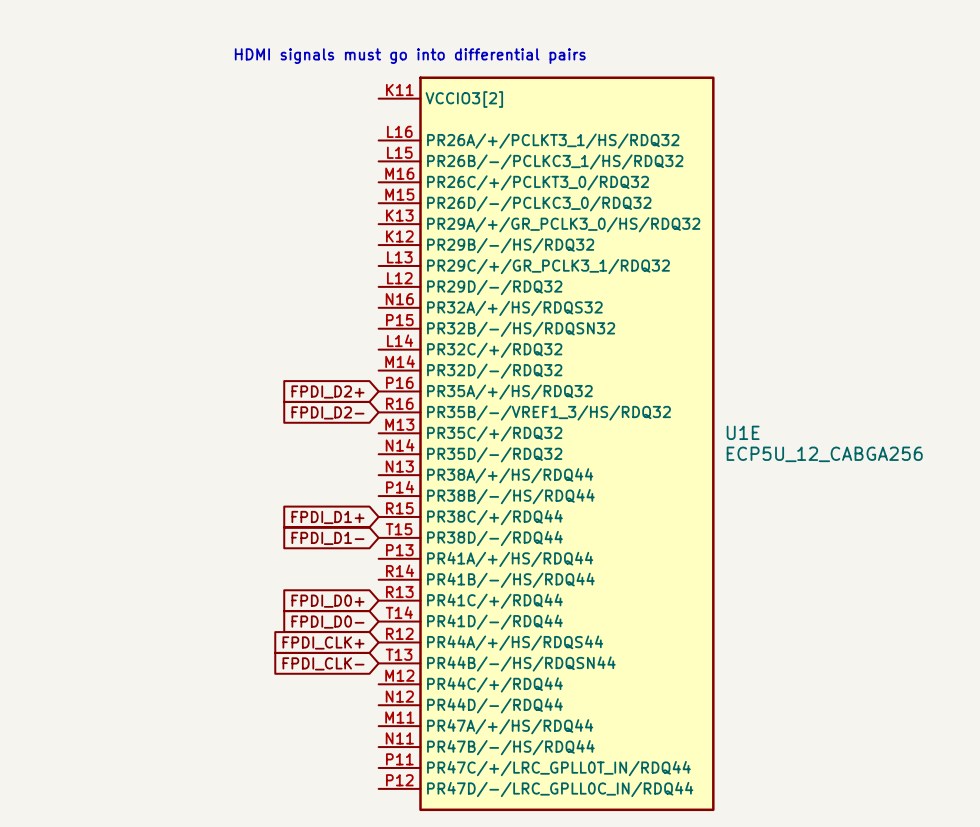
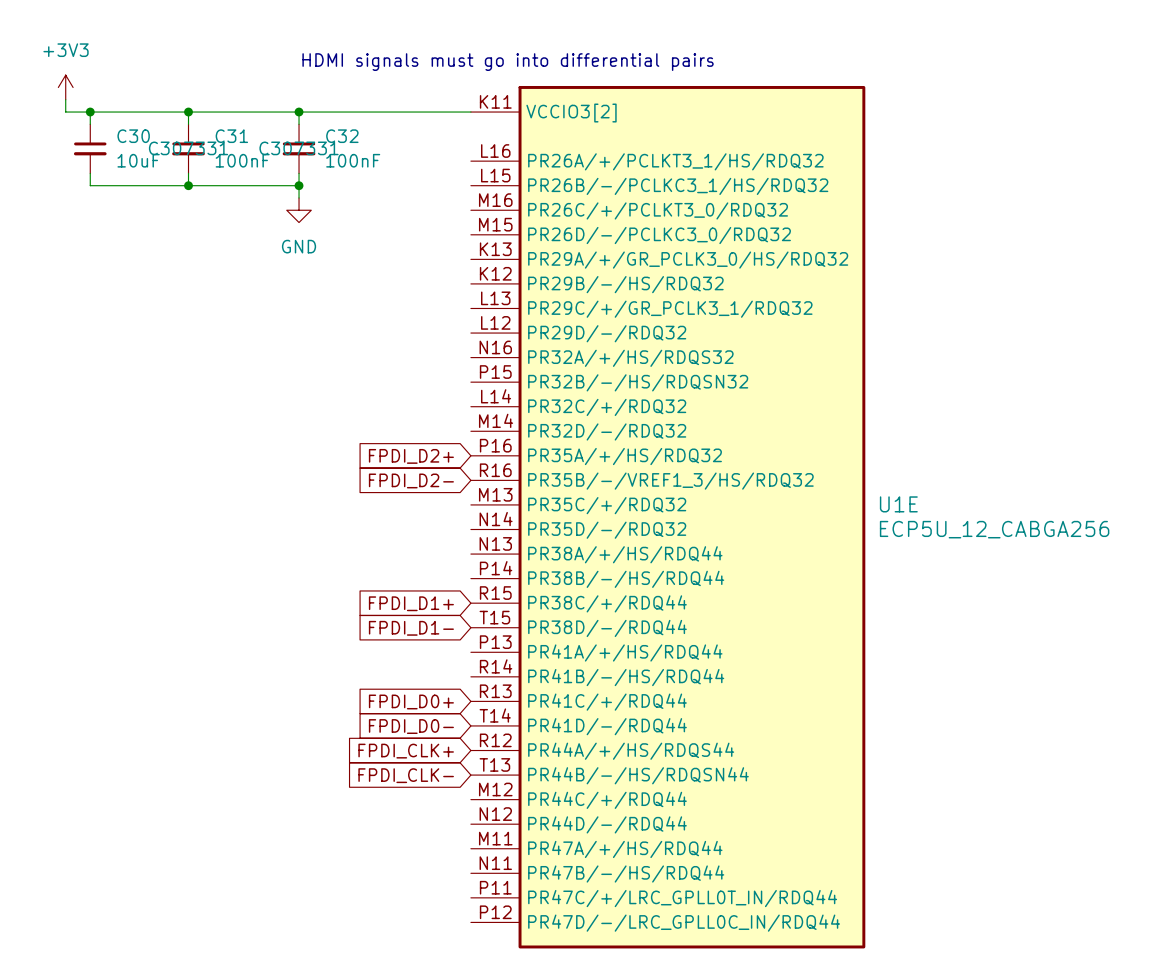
power symbol: none -> +3V3 (65, 87)
wire: none -> (65, 99) (65, 112) (470, 112)
wire: none -> (90, 112) (90, 124)
junction: none -> (90, 112)
wire: none -> (188, 112) (188, 124)
junction: none -> (188, 112)
wire: none -> (299, 112) (299, 124)
junction: none -> (299, 112)
C30: none -> 10uF (90, 148)
C31: none -> 100nF (188, 148)
C32: none -> 100nF (299, 148)
wire: none -> (90, 173) (90, 185) (299, 185)
wire: none -> (188, 173) (188, 185)
wire: none -> (299, 173) (299, 197)
junction: none -> (188, 185)
junction: none -> (299, 185)
power symbol: none -> GND (299, 210)

